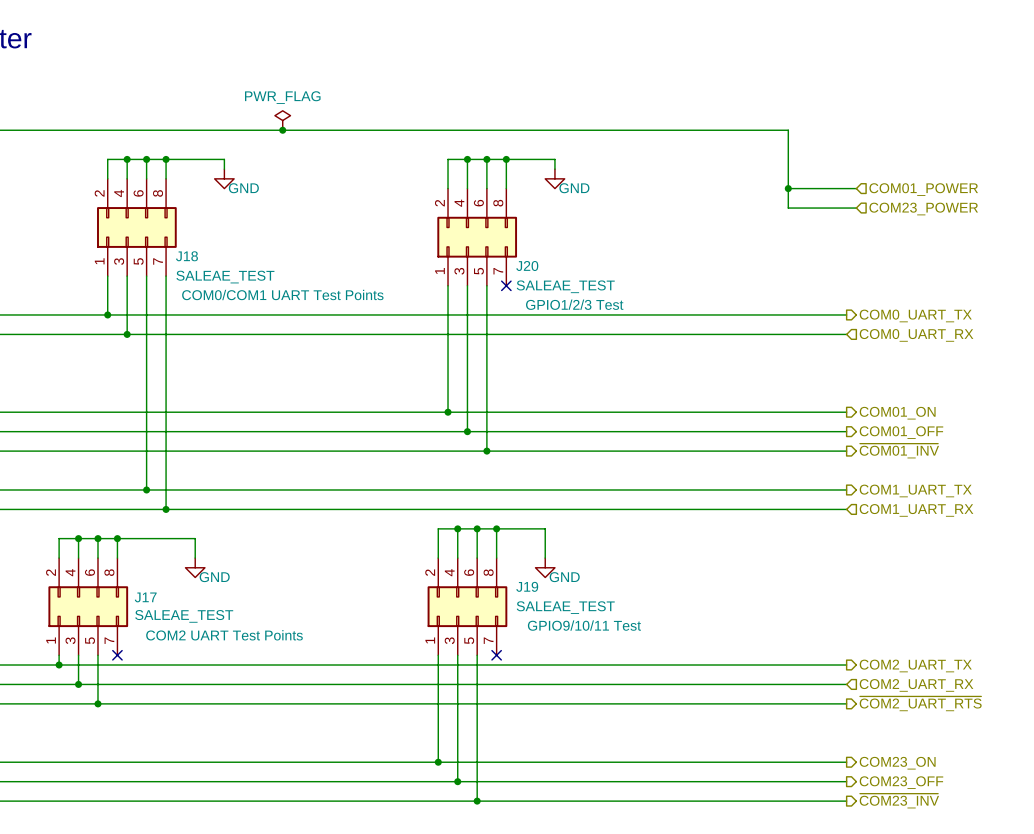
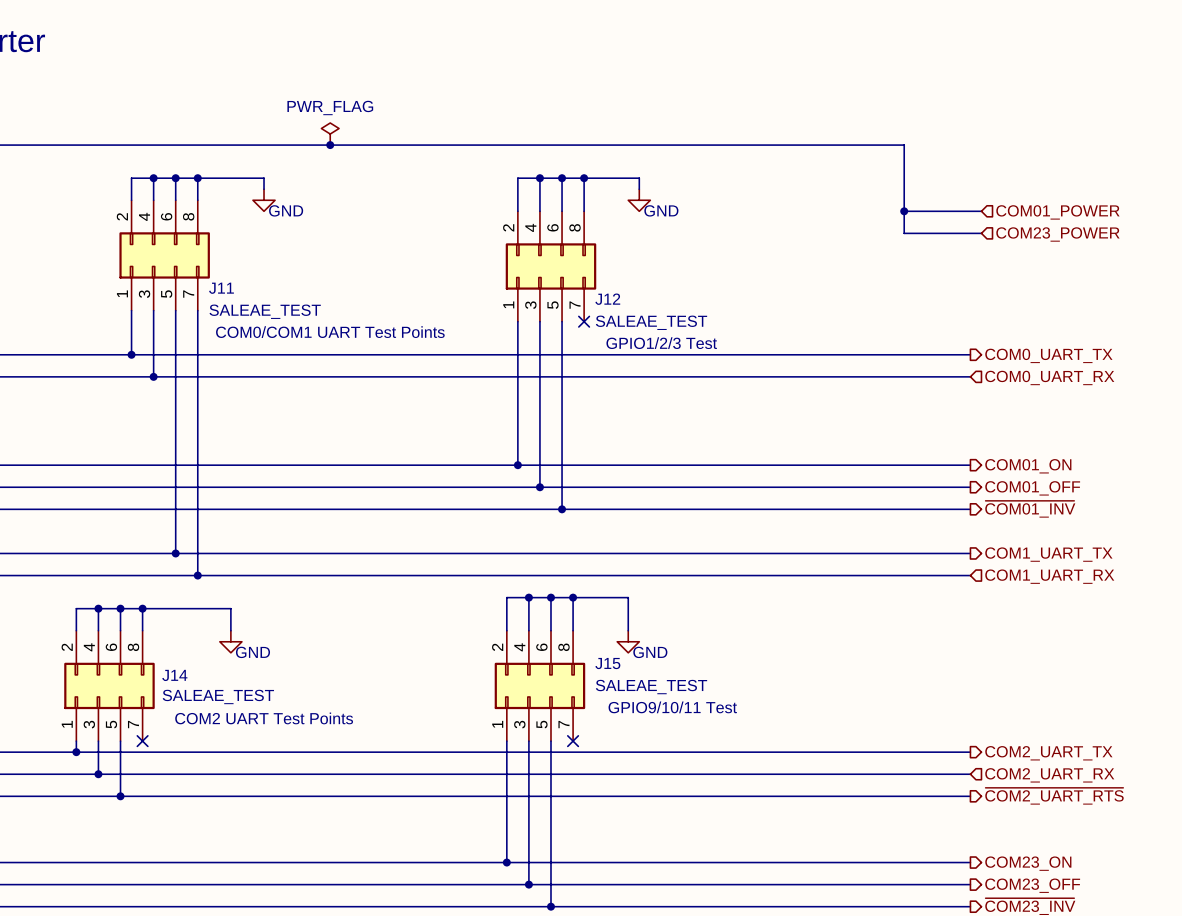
J18 name: J18 (186, 256) -> J11 (221, 288)
J20 name: J20 (527, 266) -> J12 (607, 299)
J19 name: J19 (527, 586) -> J15 (607, 663)
J17 name: J17 (145, 597) -> J14 (174, 675)

